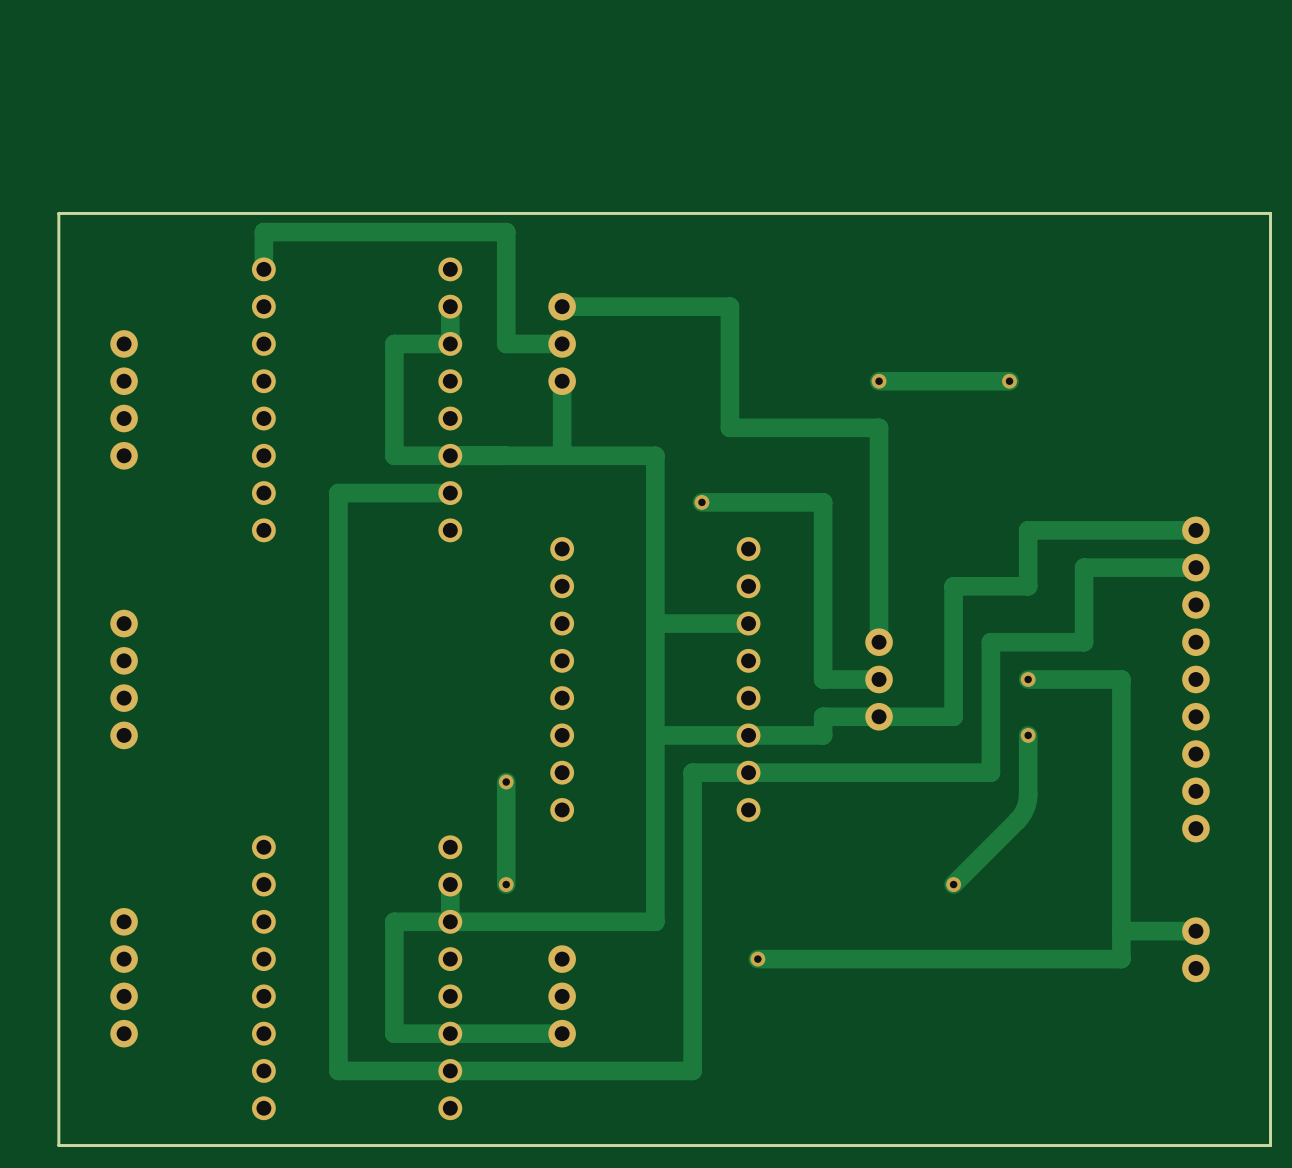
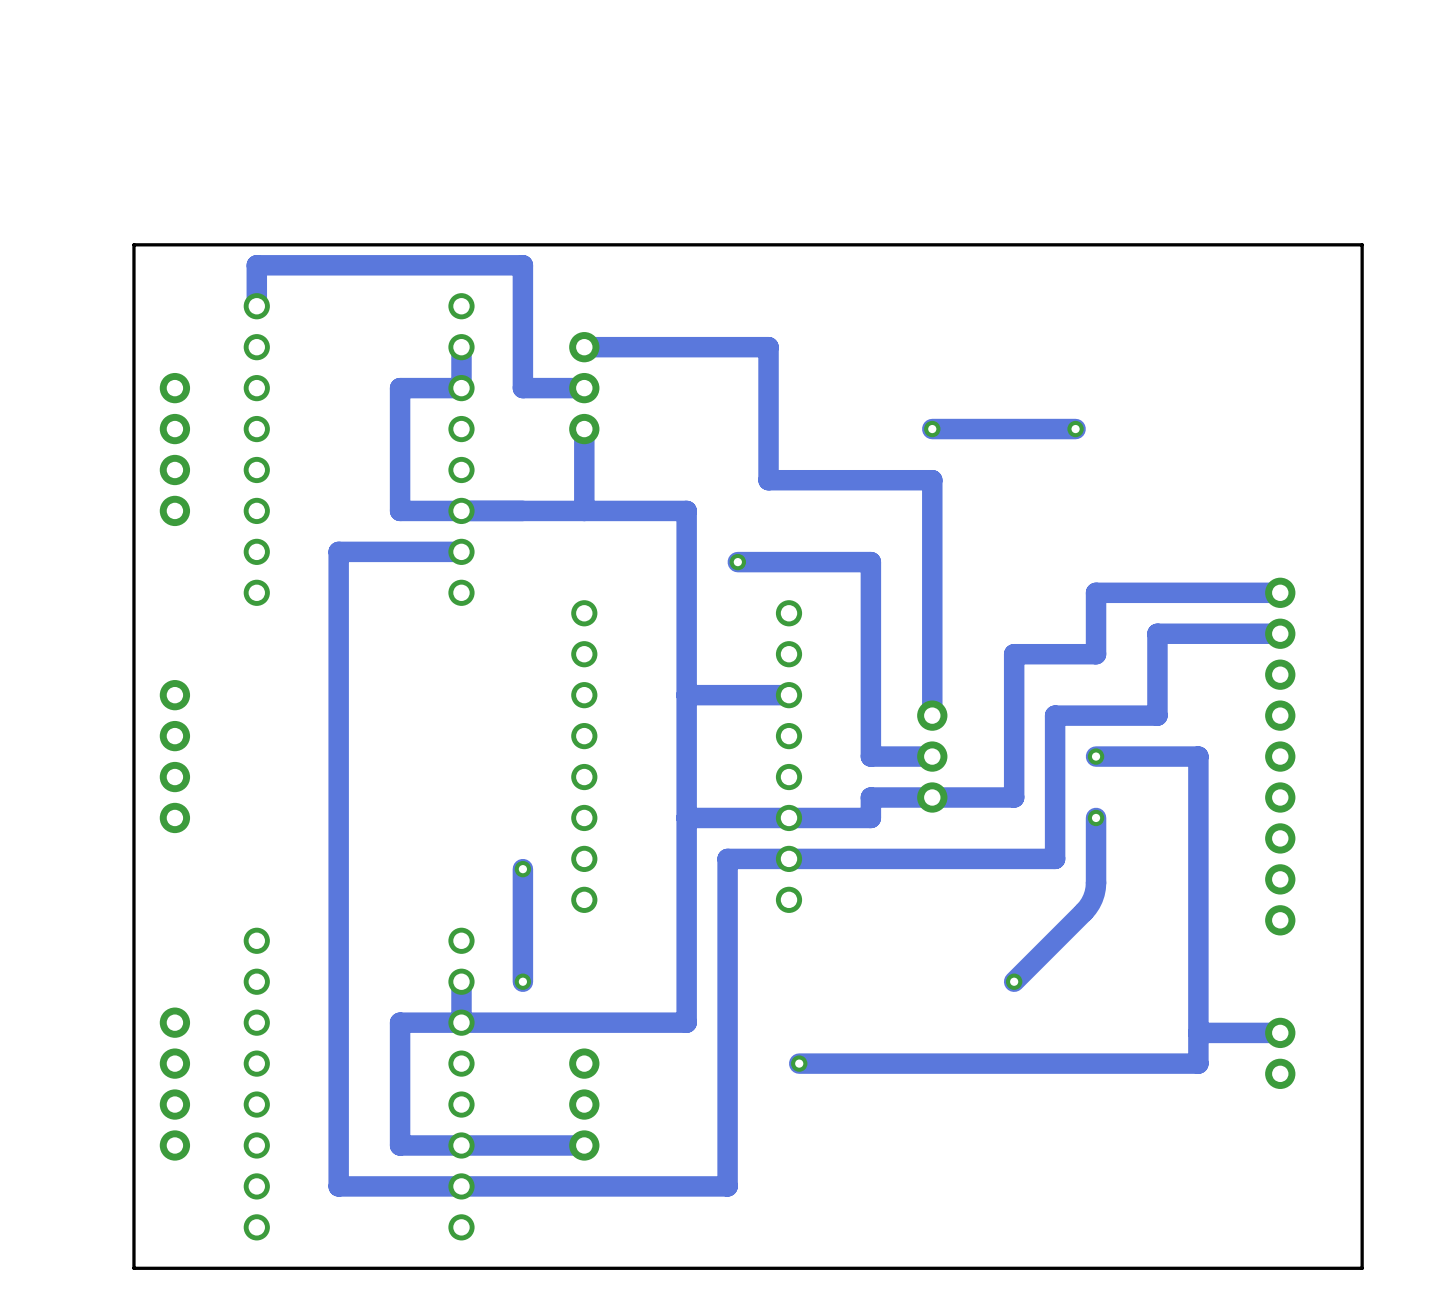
board edge: (152, 213) (58, 213) (58, 1145) (152, 1145) -> (133, 244) (133, 1268)
part position: (124, 399) -> (174, 449)
part position: (124, 679) -> (174, 756)
part position: (124, 977) -> (174, 1084)

